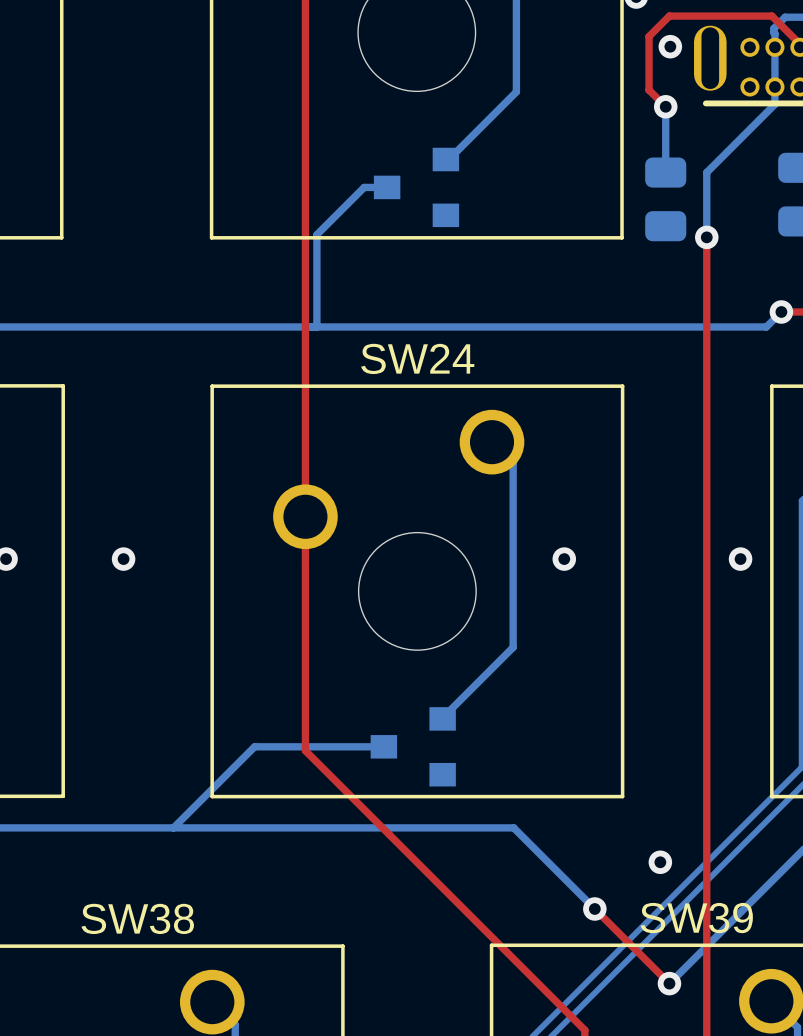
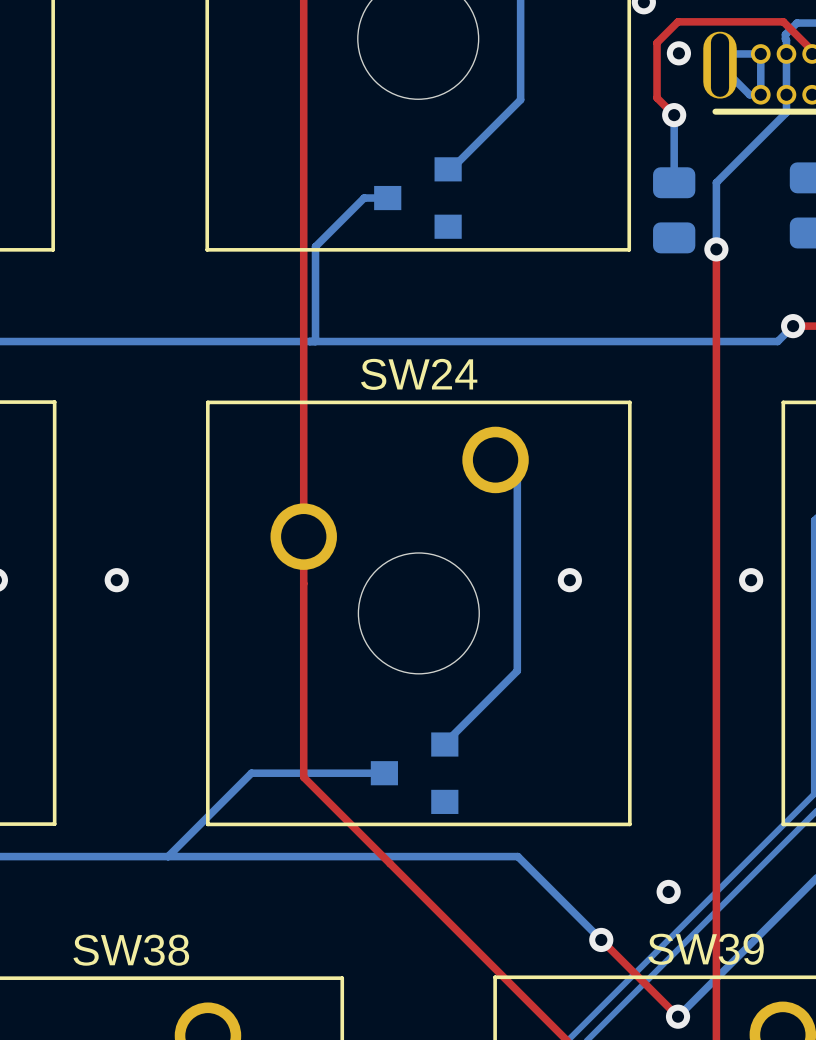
bottom track: none -> (731, 53) (720, 65) (749, 94) (760, 94) (760, 53) (731, 53)

